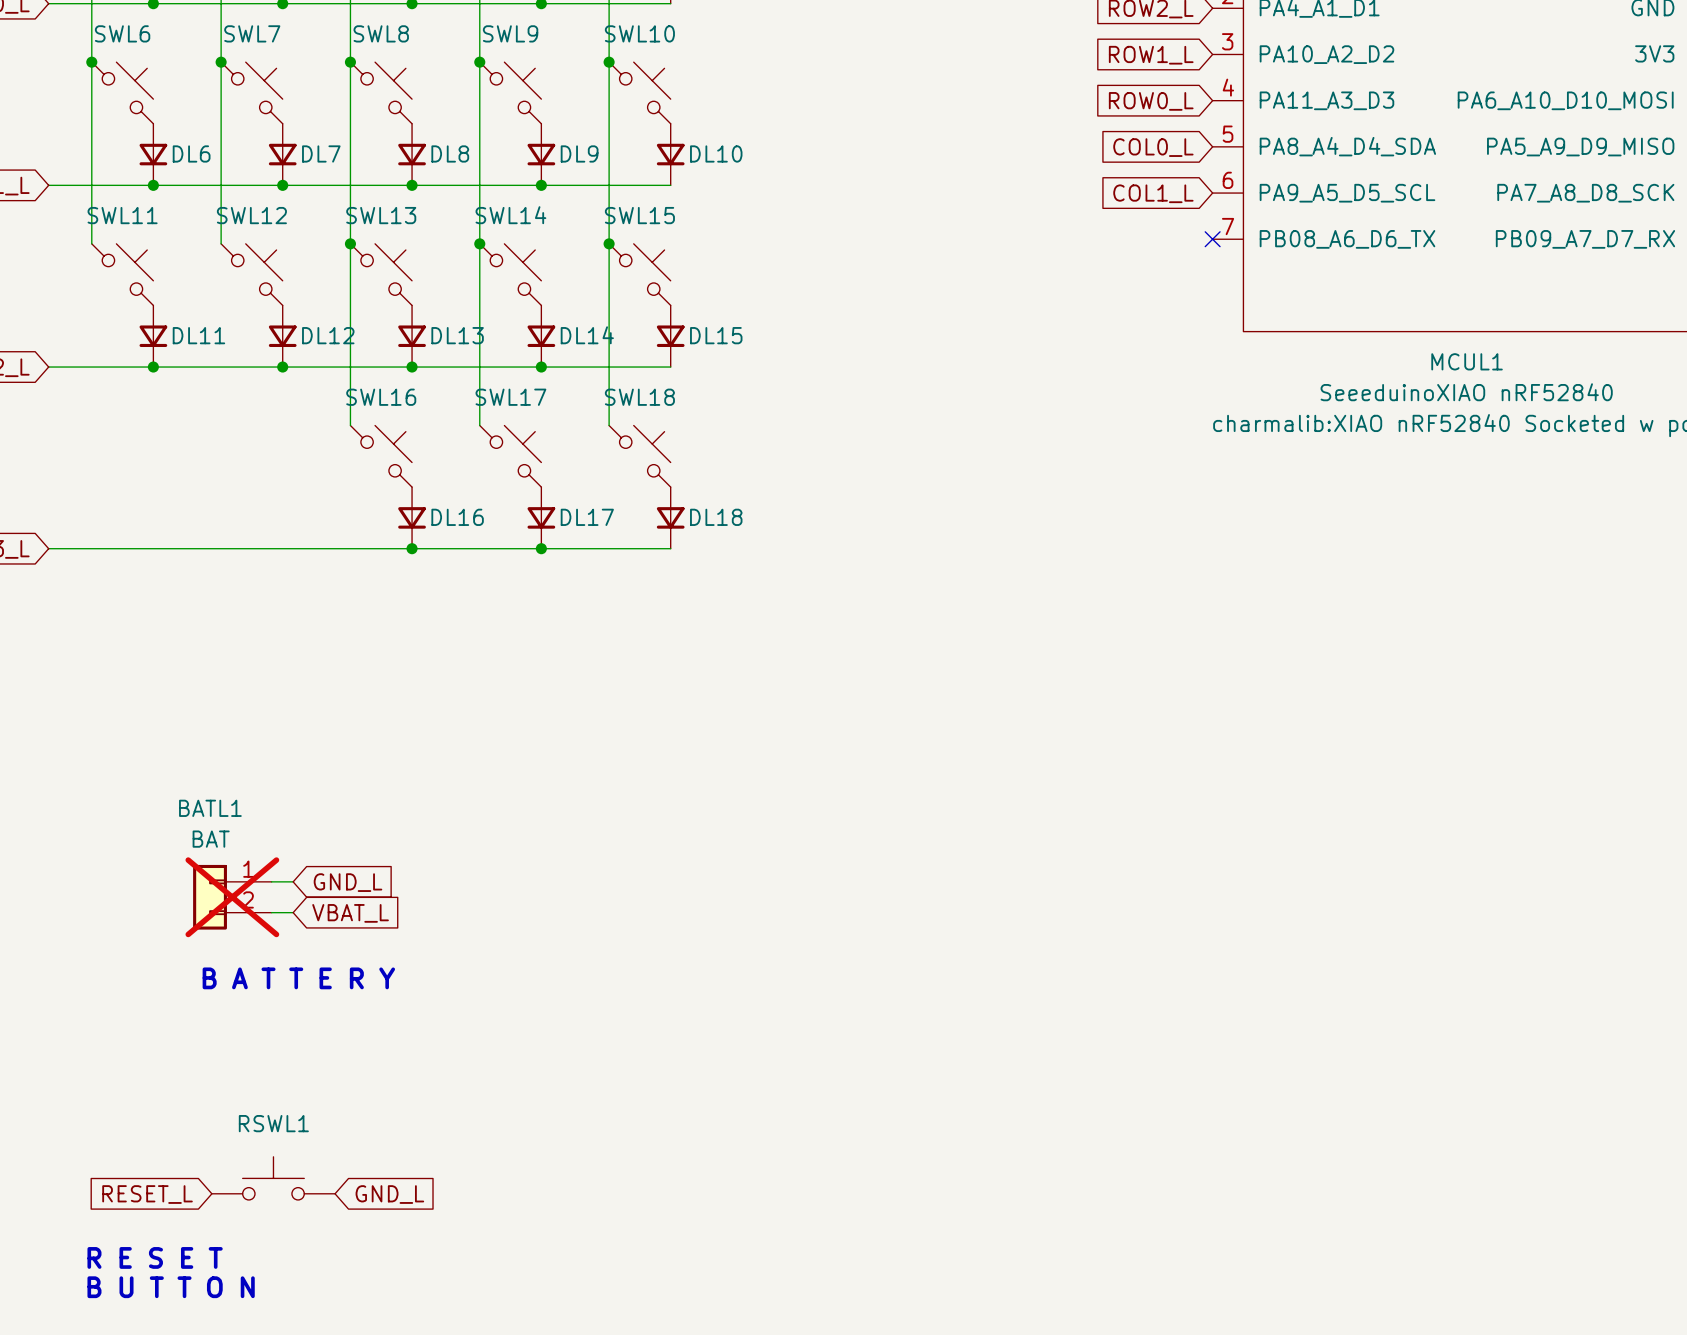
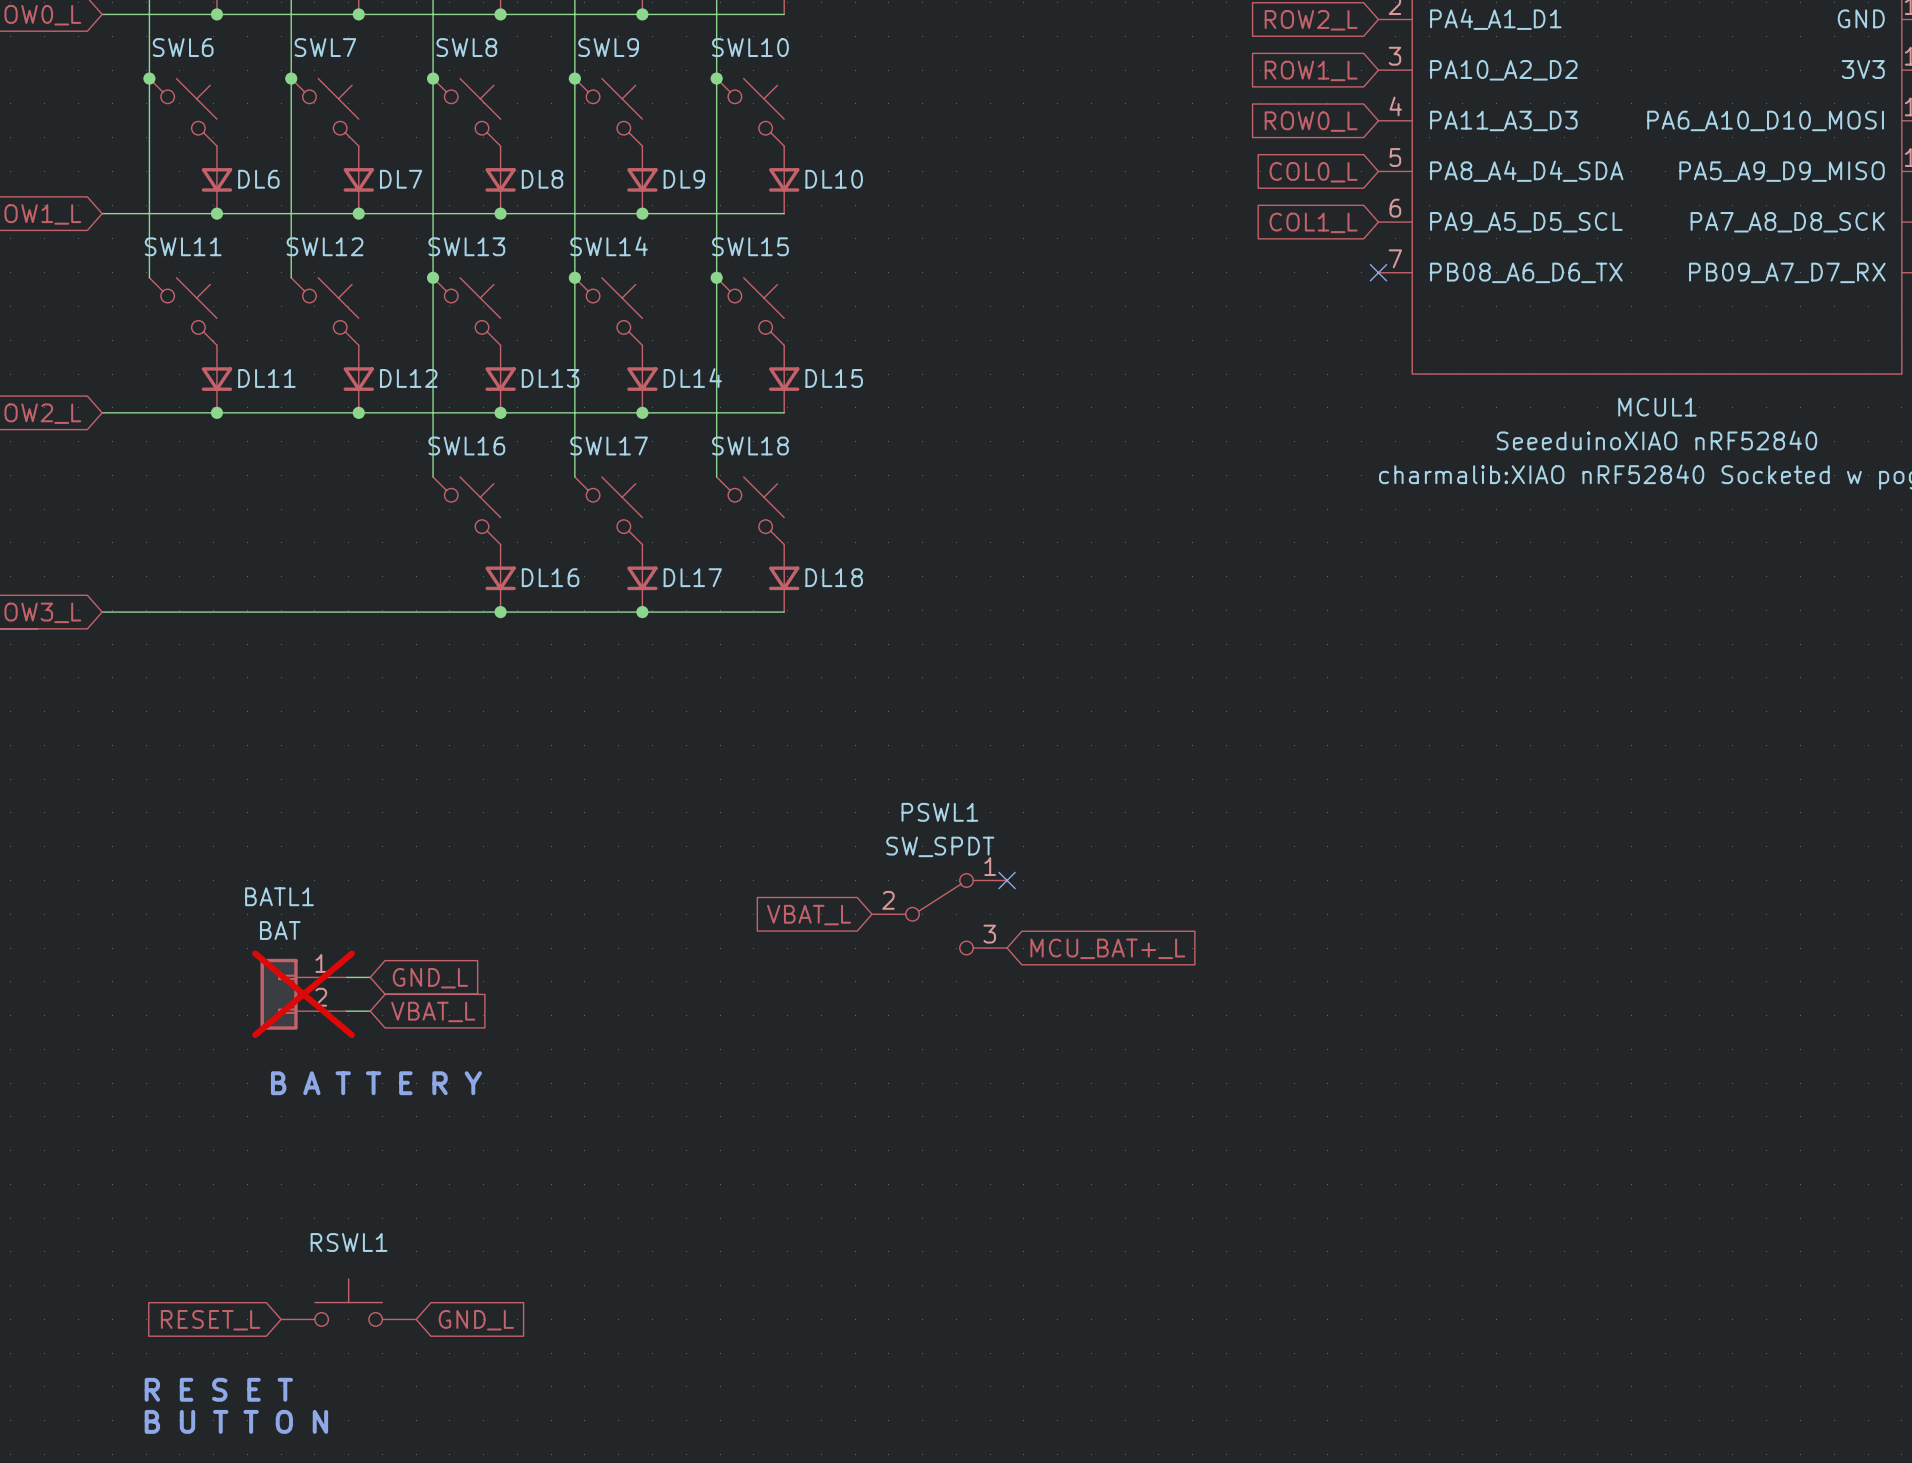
no-connect mark: none -> (1007, 880)
PSWL1: none -> SW_SPDT (939, 914)
global label: none -> VBAT_L (809, 915)
global label: none -> MCU_BAT+_L (1107, 948)

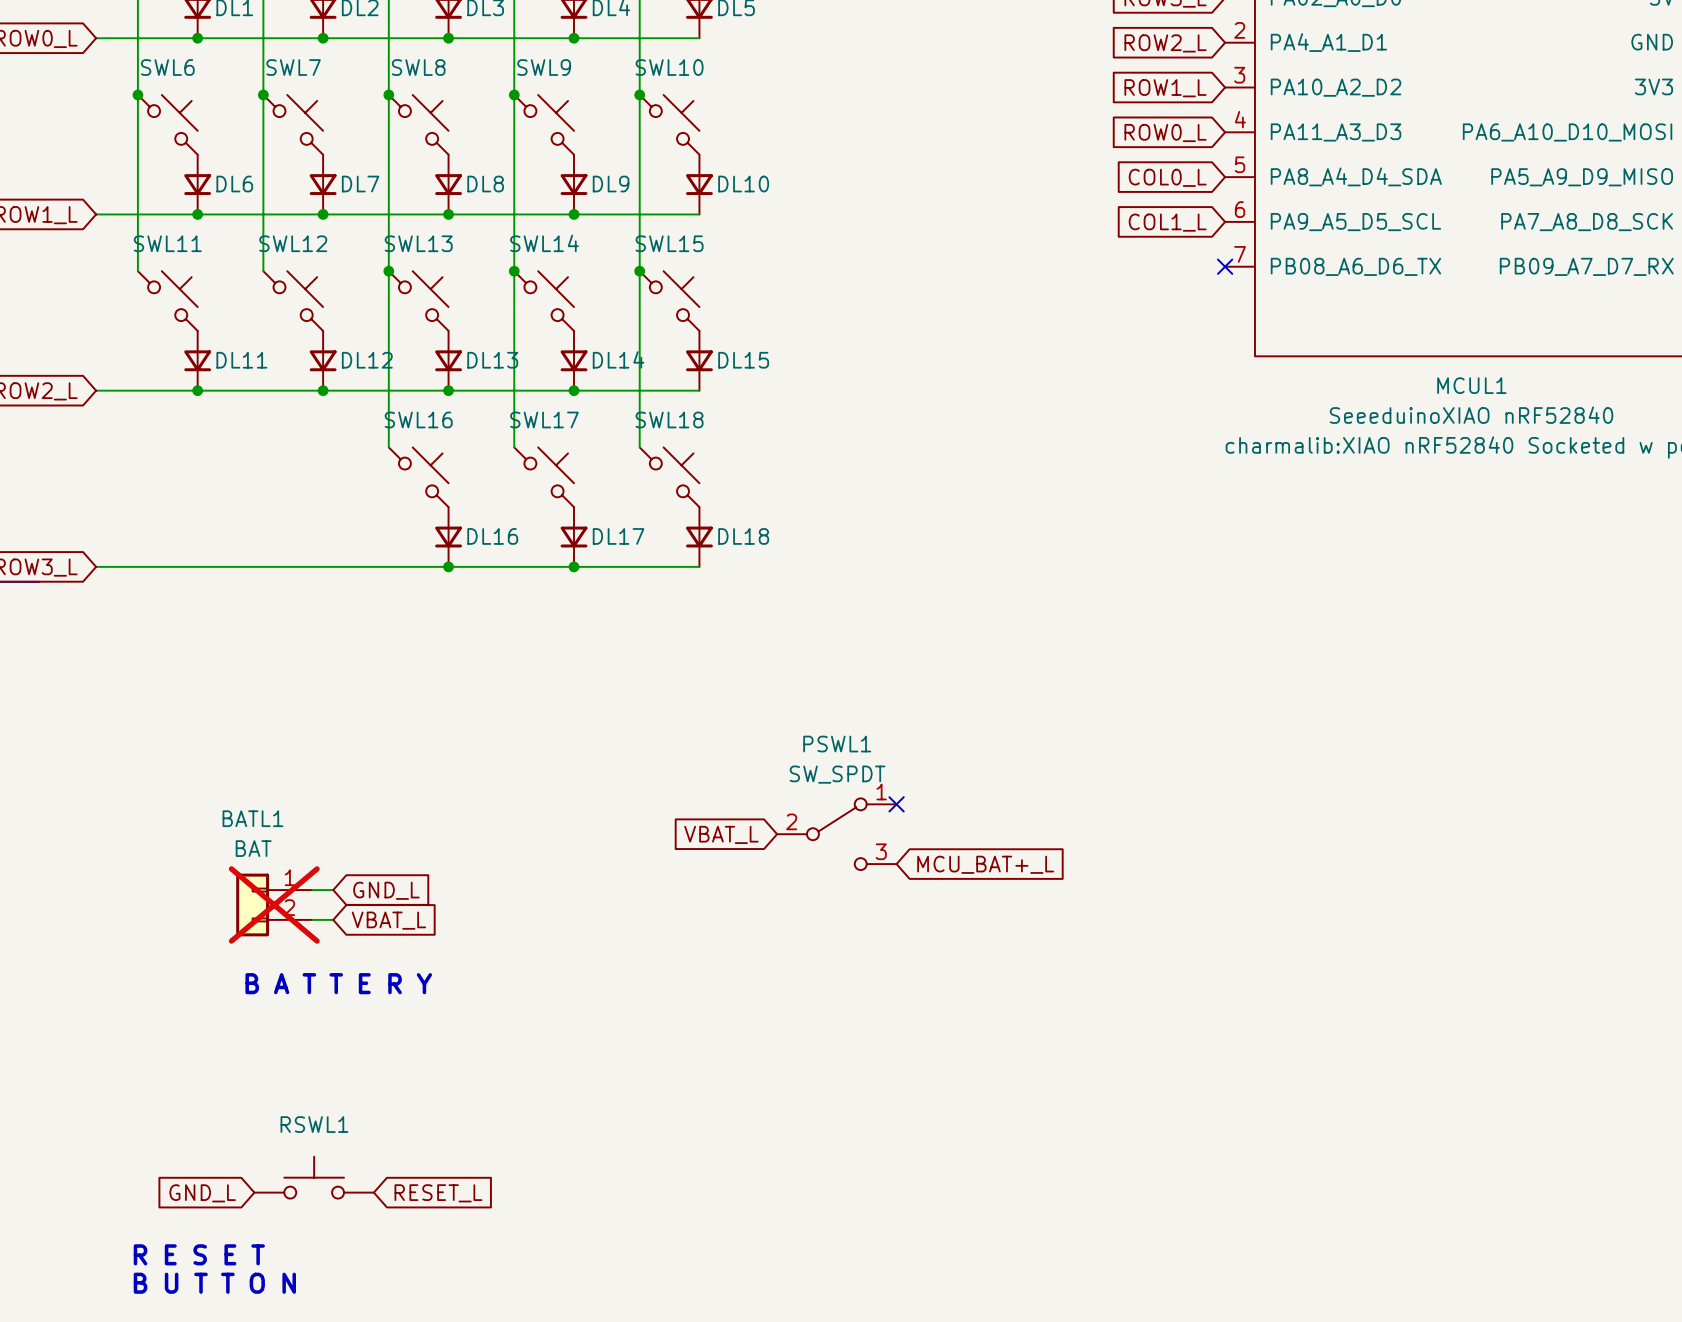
global label: RESET_L (210, 1320) -> GND_L (202, 1193)
global label: GND_L (476, 1320) -> RESET_L (438, 1193)

